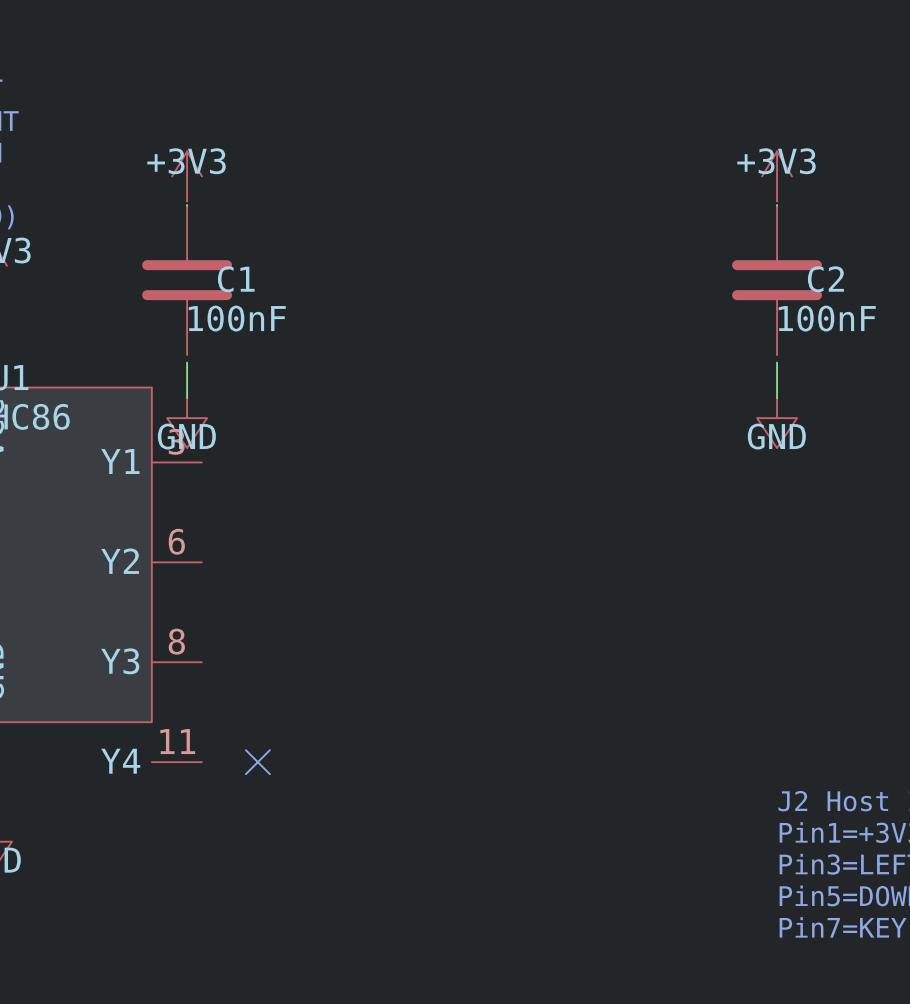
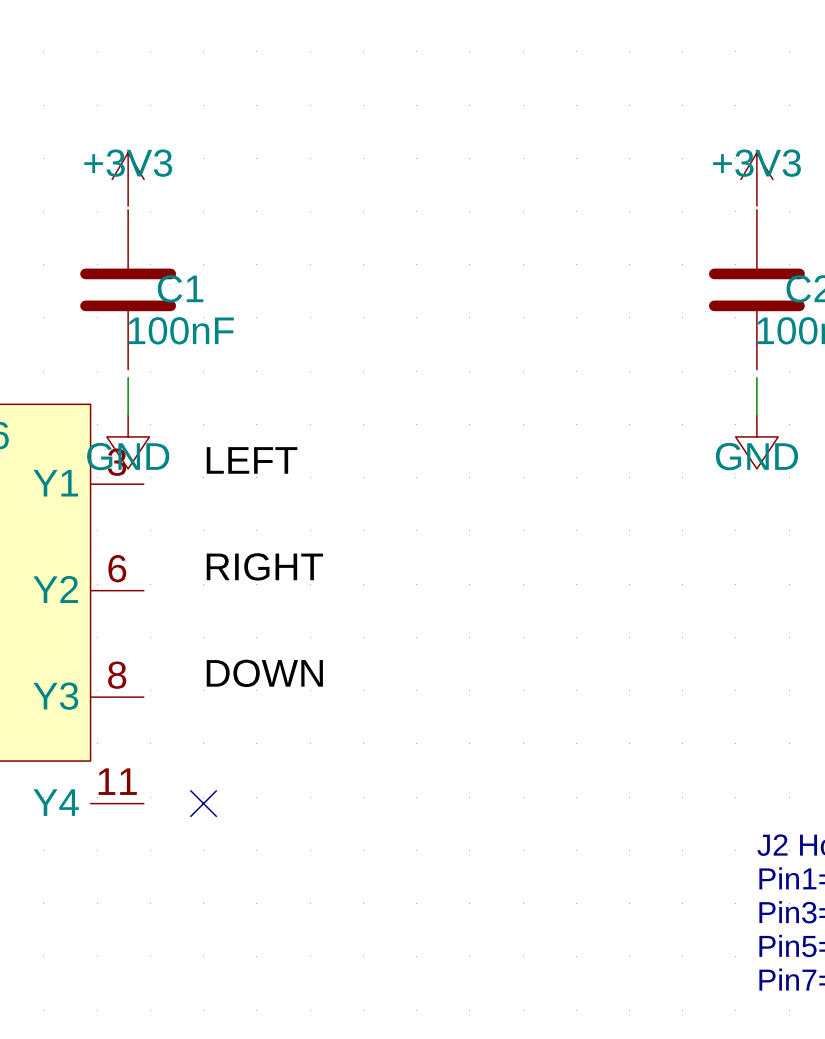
label: none -> LEFT (252, 460)
label: none -> RIGHT (264, 566)
label: none -> DOWN (264, 673)

